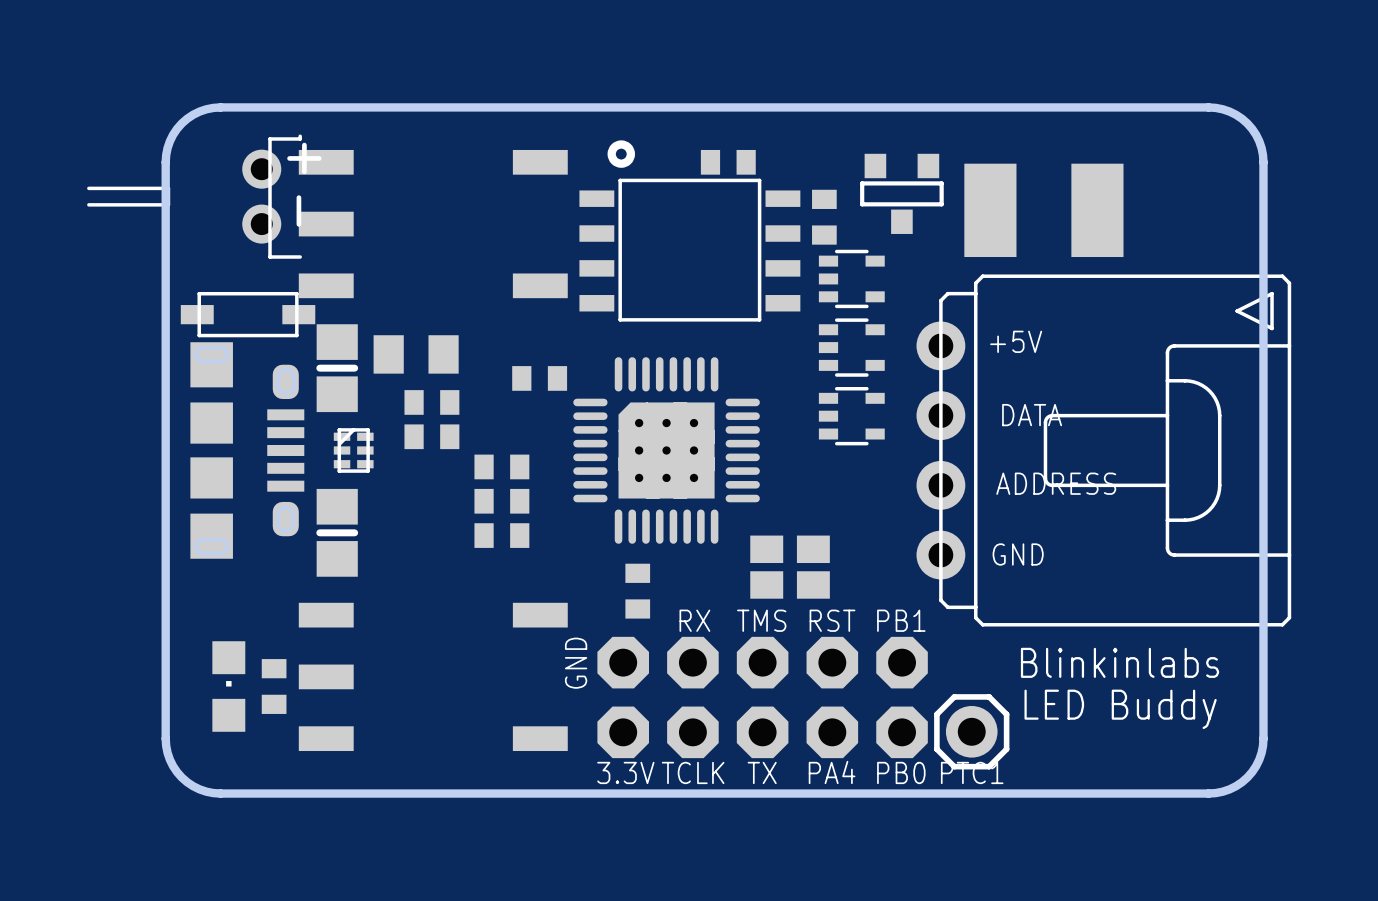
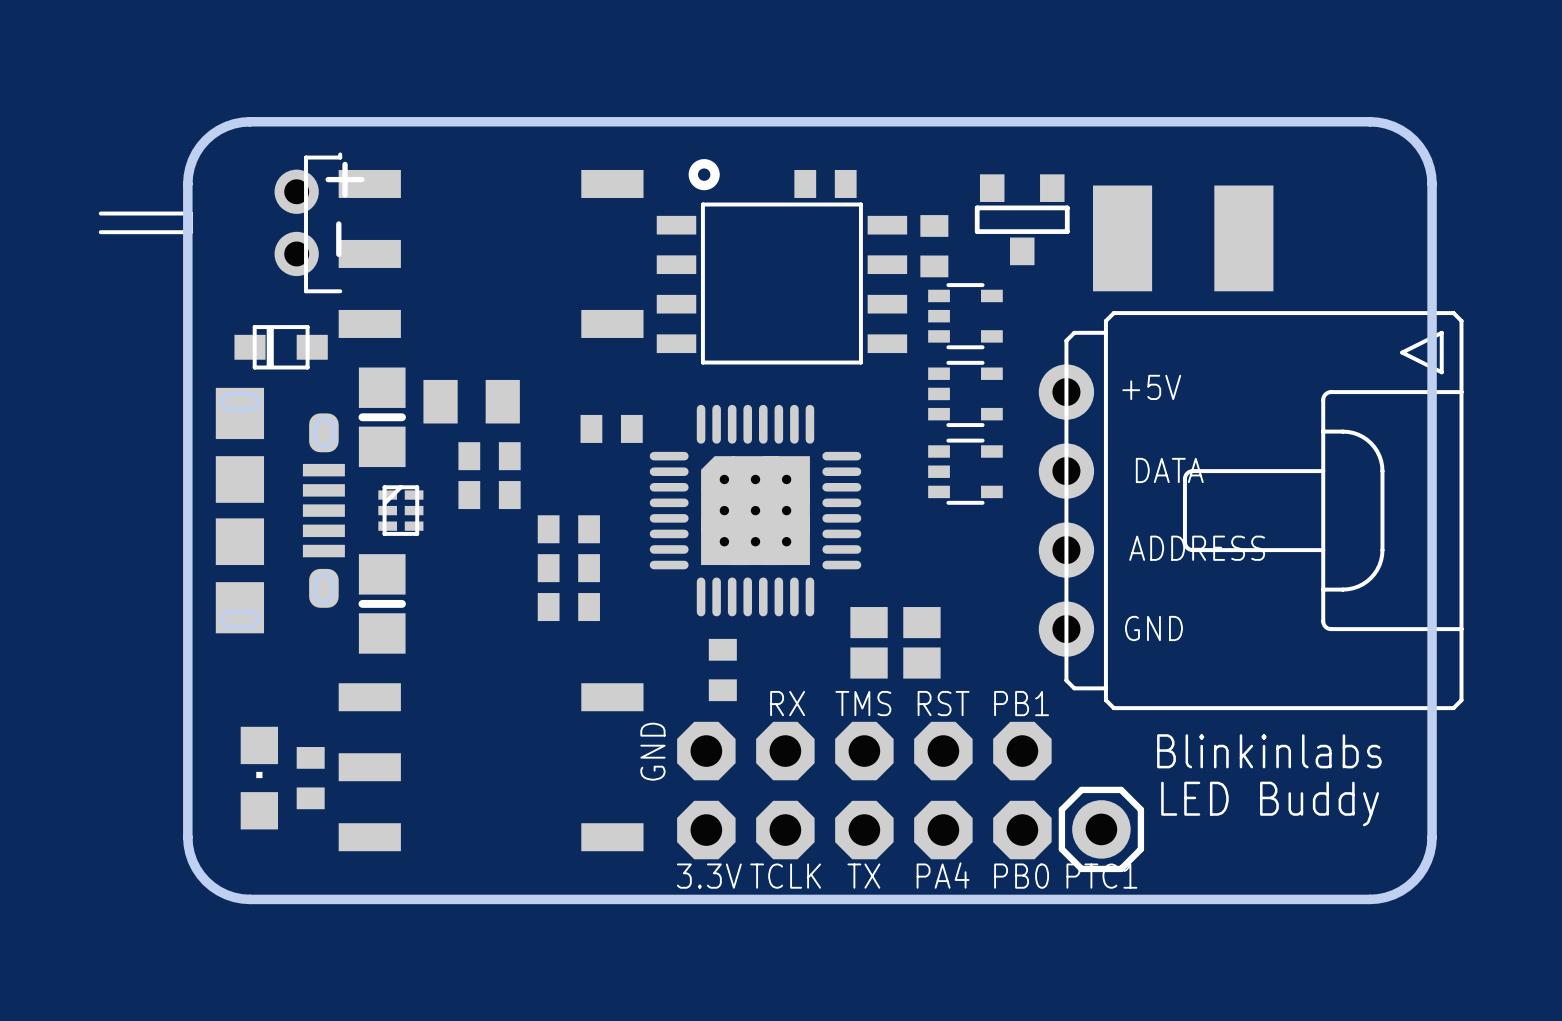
part footprint: [180, 291, 316, 338] -> [234, 325, 328, 370]

